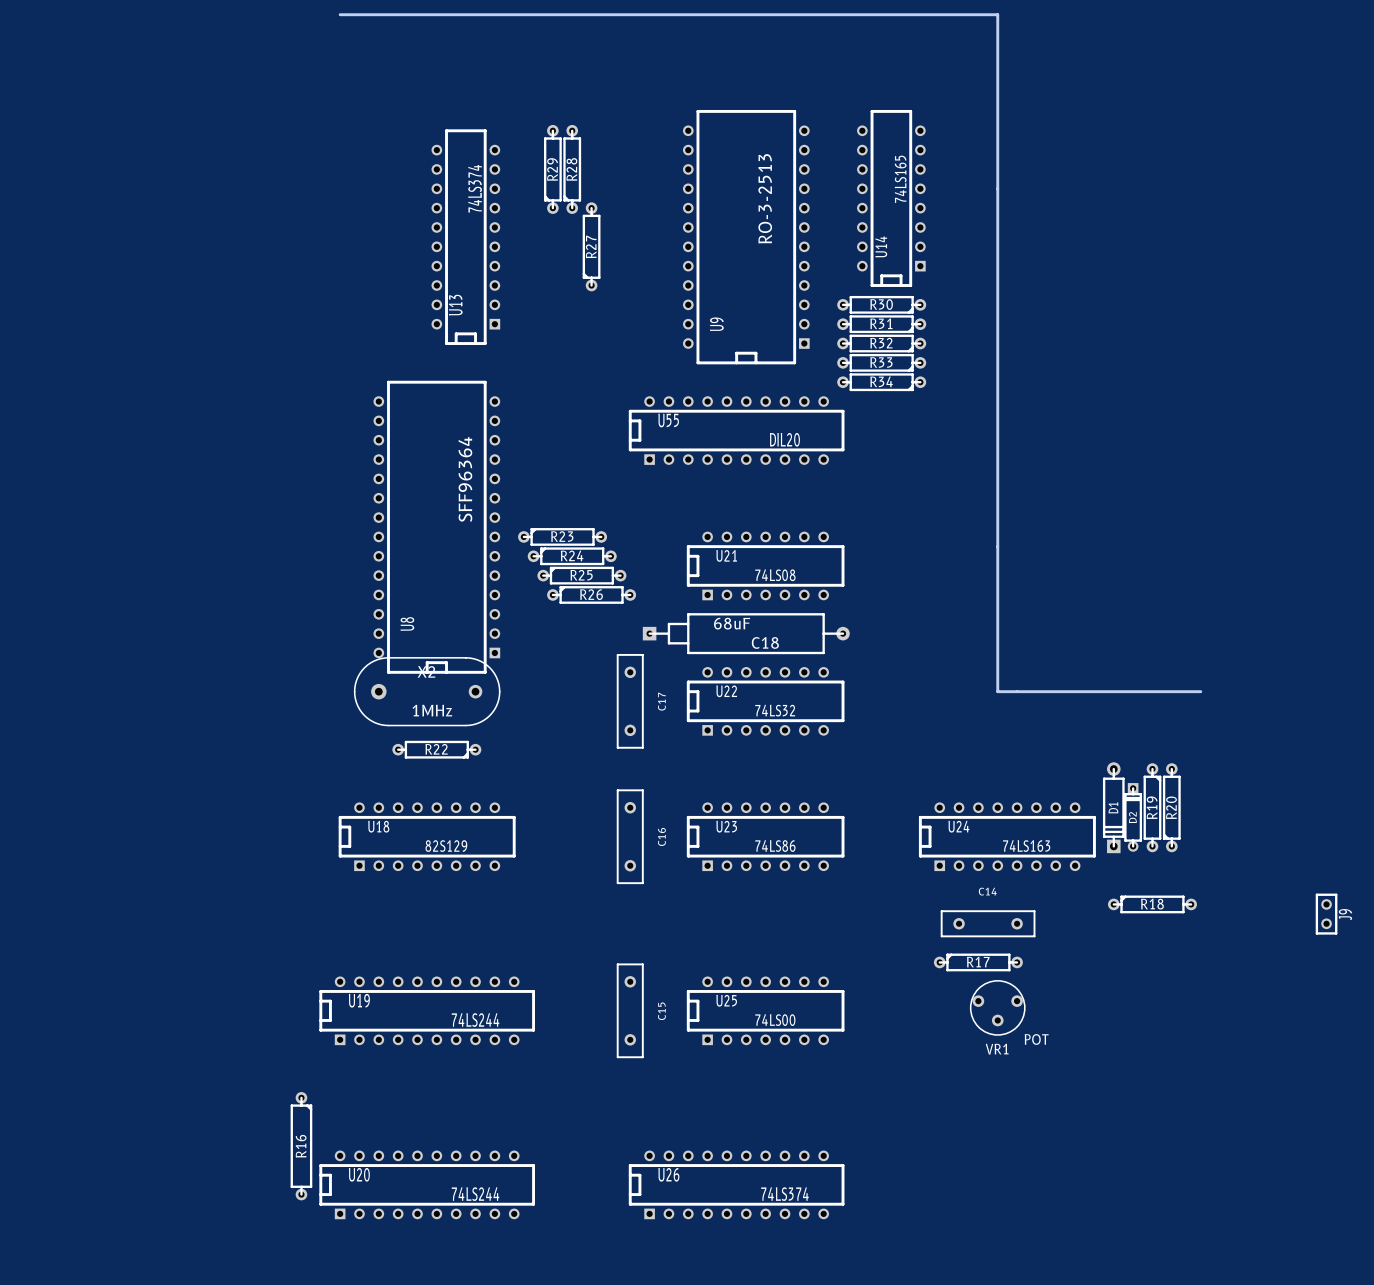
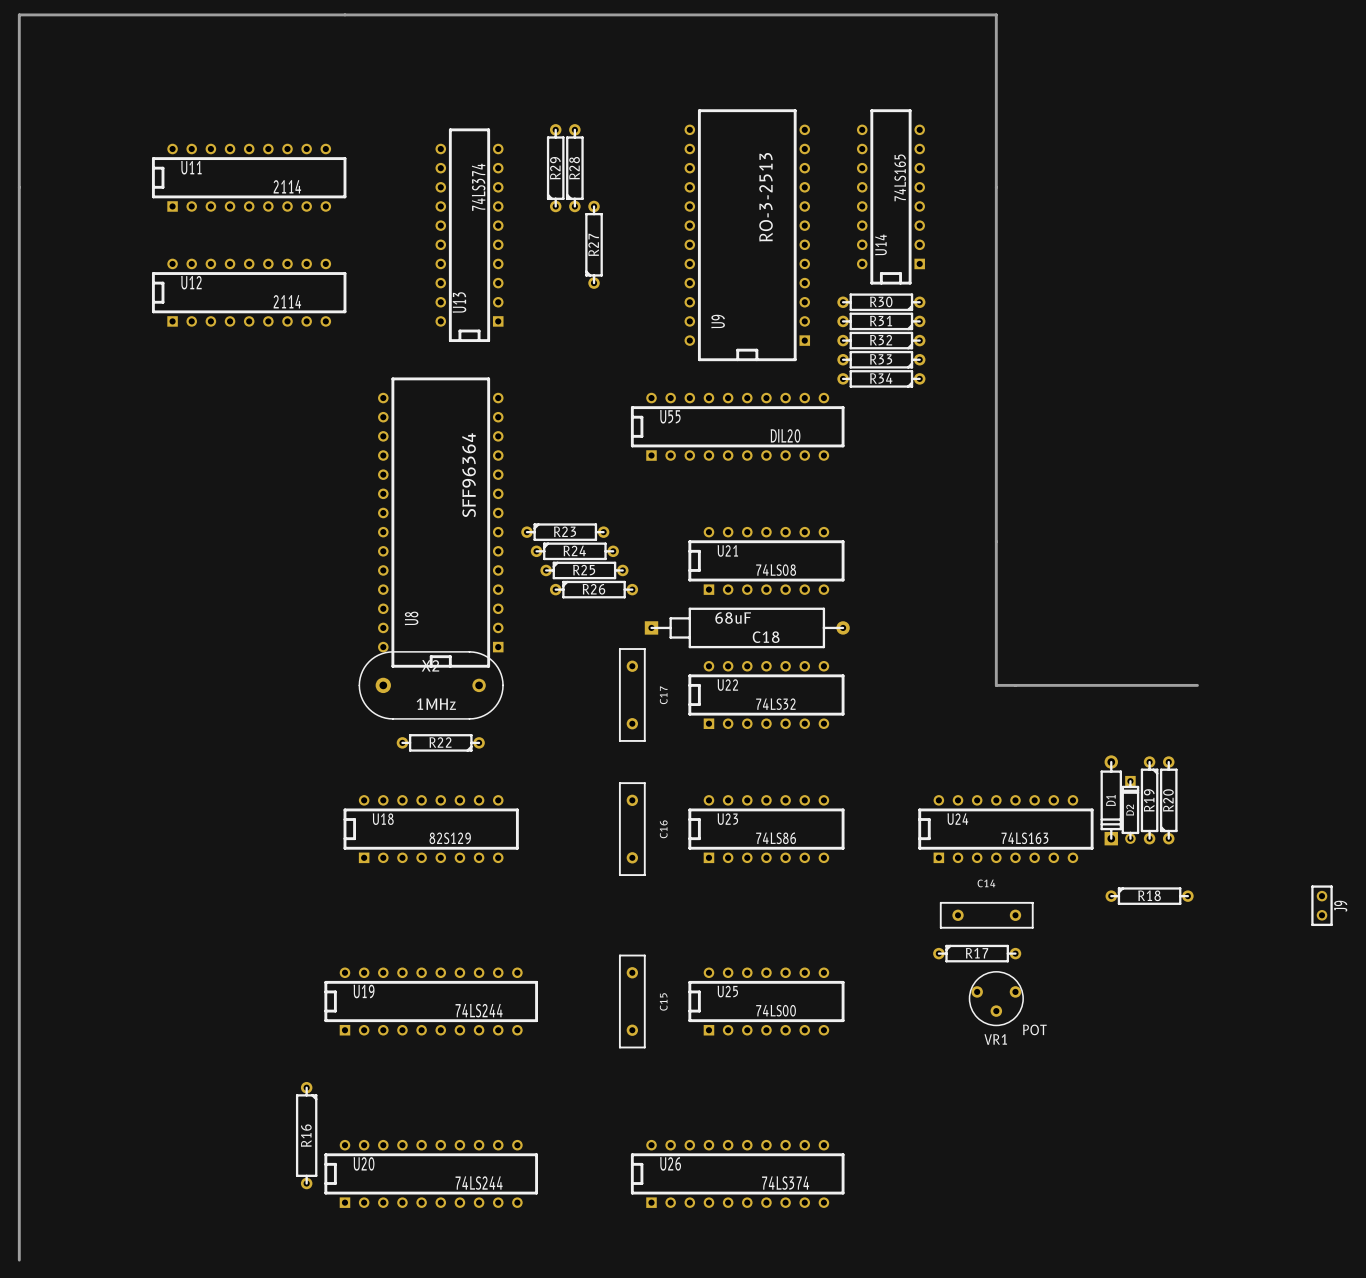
board edge: none -> (344, 14) (19, 14) (19, 1260)
U11: none -> 2114 (249, 177)
U12: none -> 2114 (249, 292)

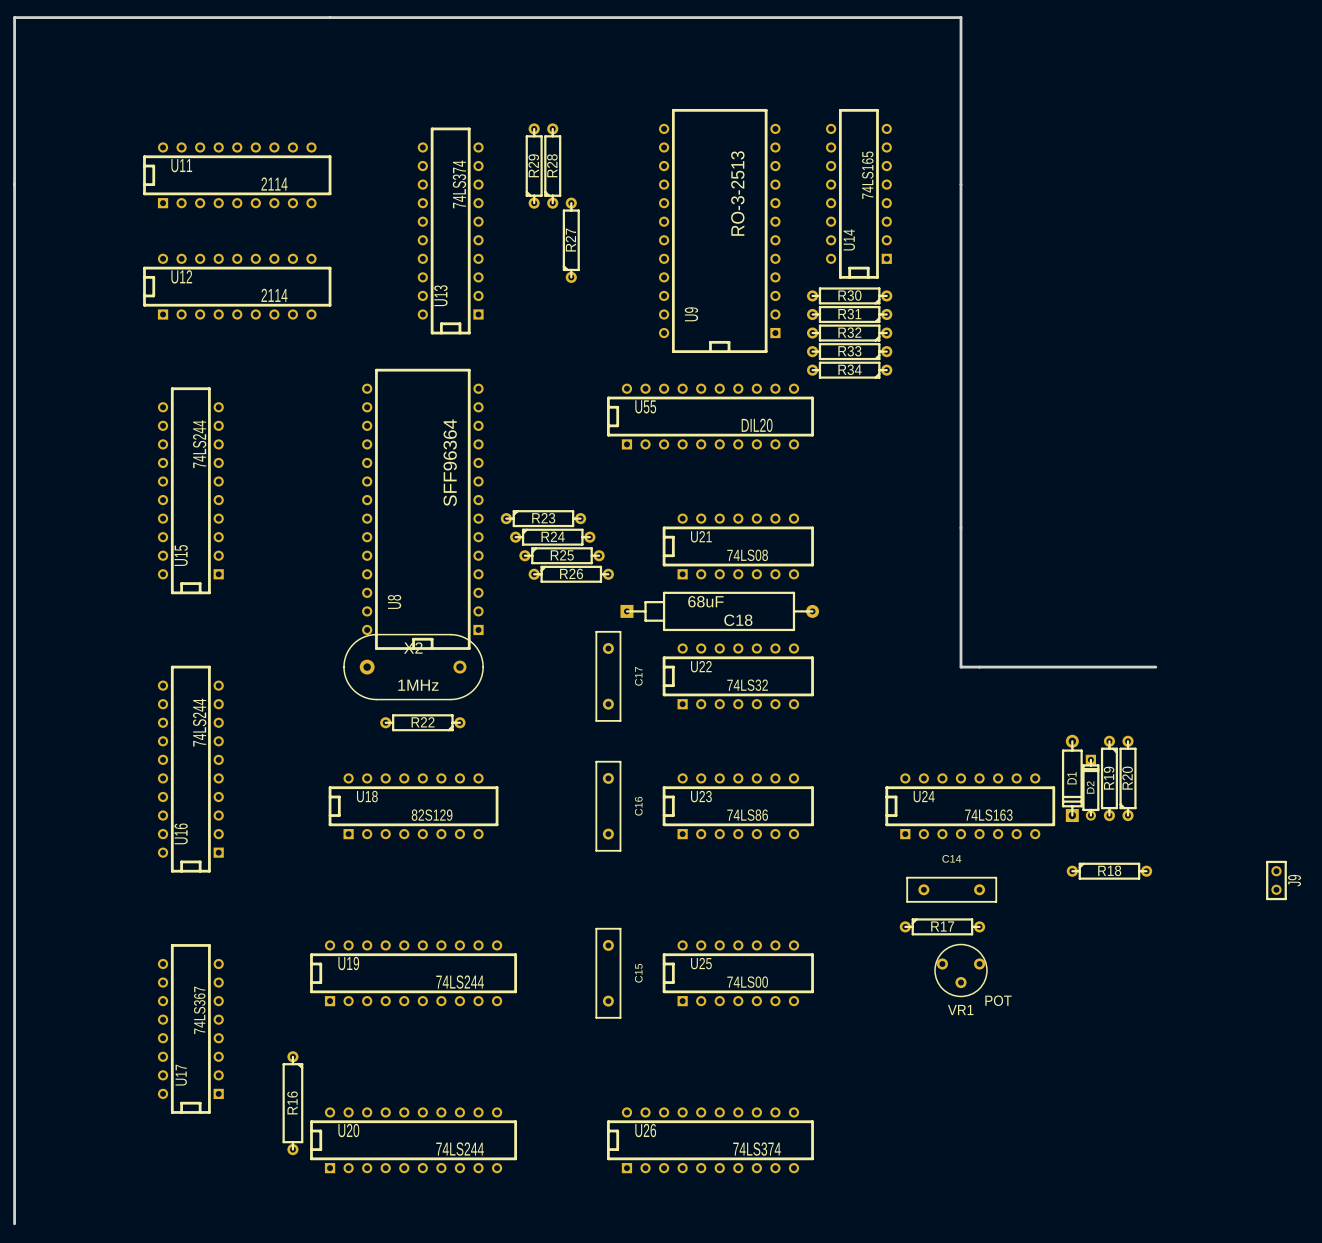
U15: none -> 74LS244 (190, 490)
U16: none -> 74LS244 (190, 769)
U17: none -> 74LS367 (190, 1028)

